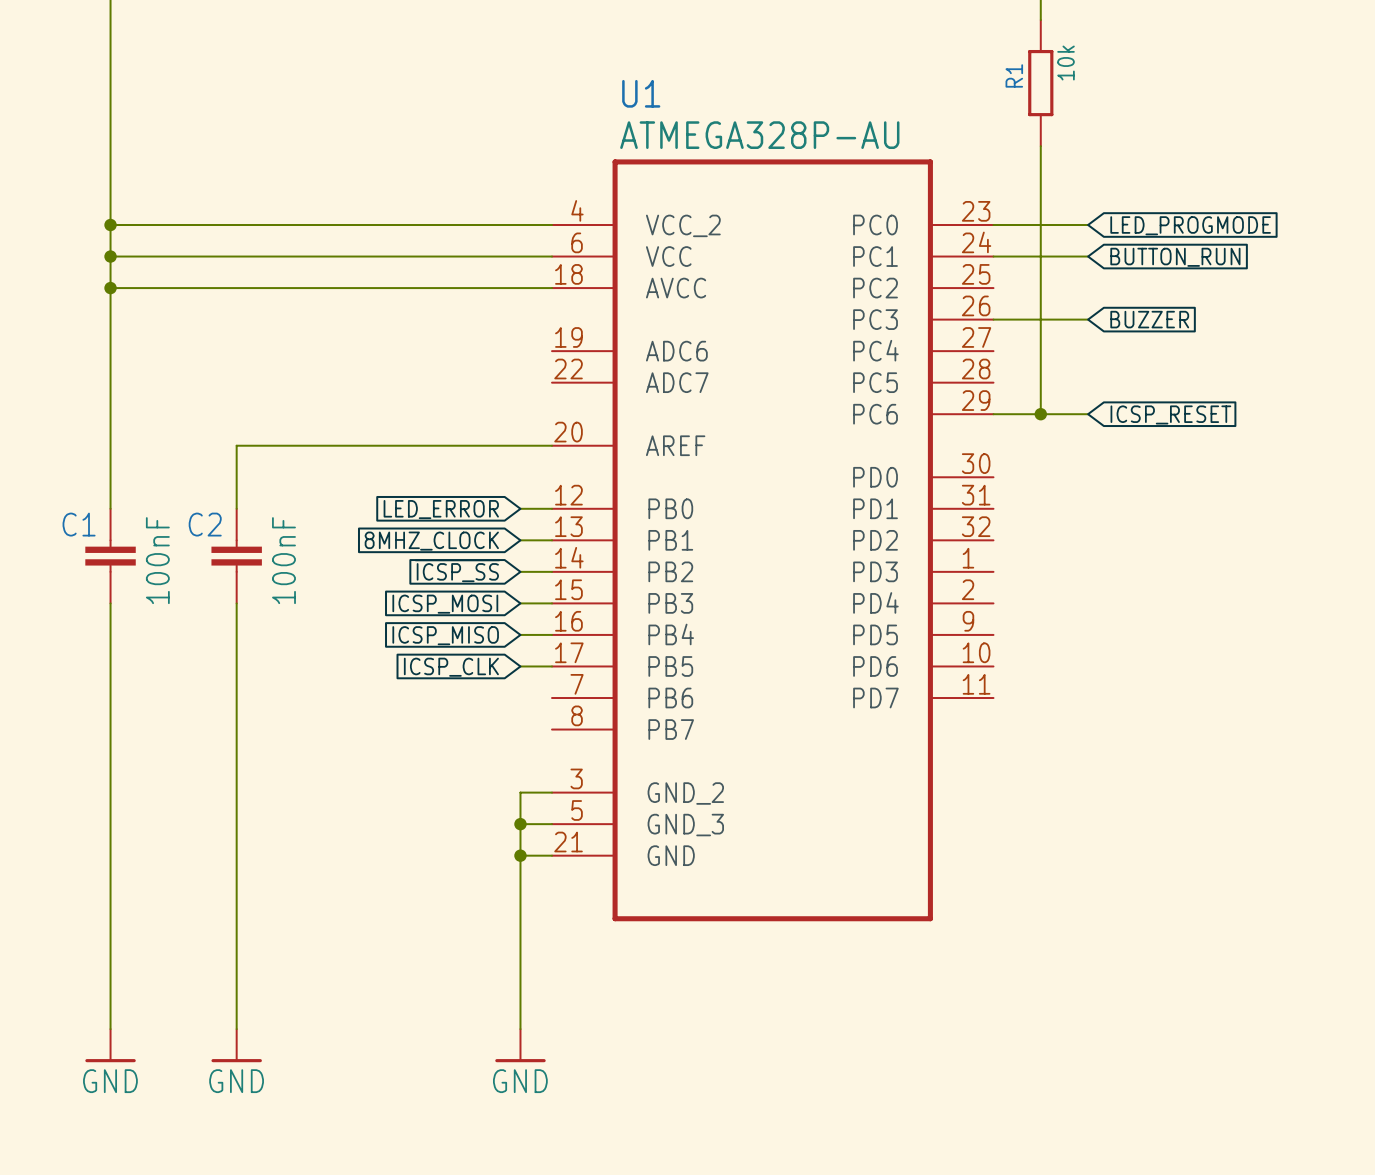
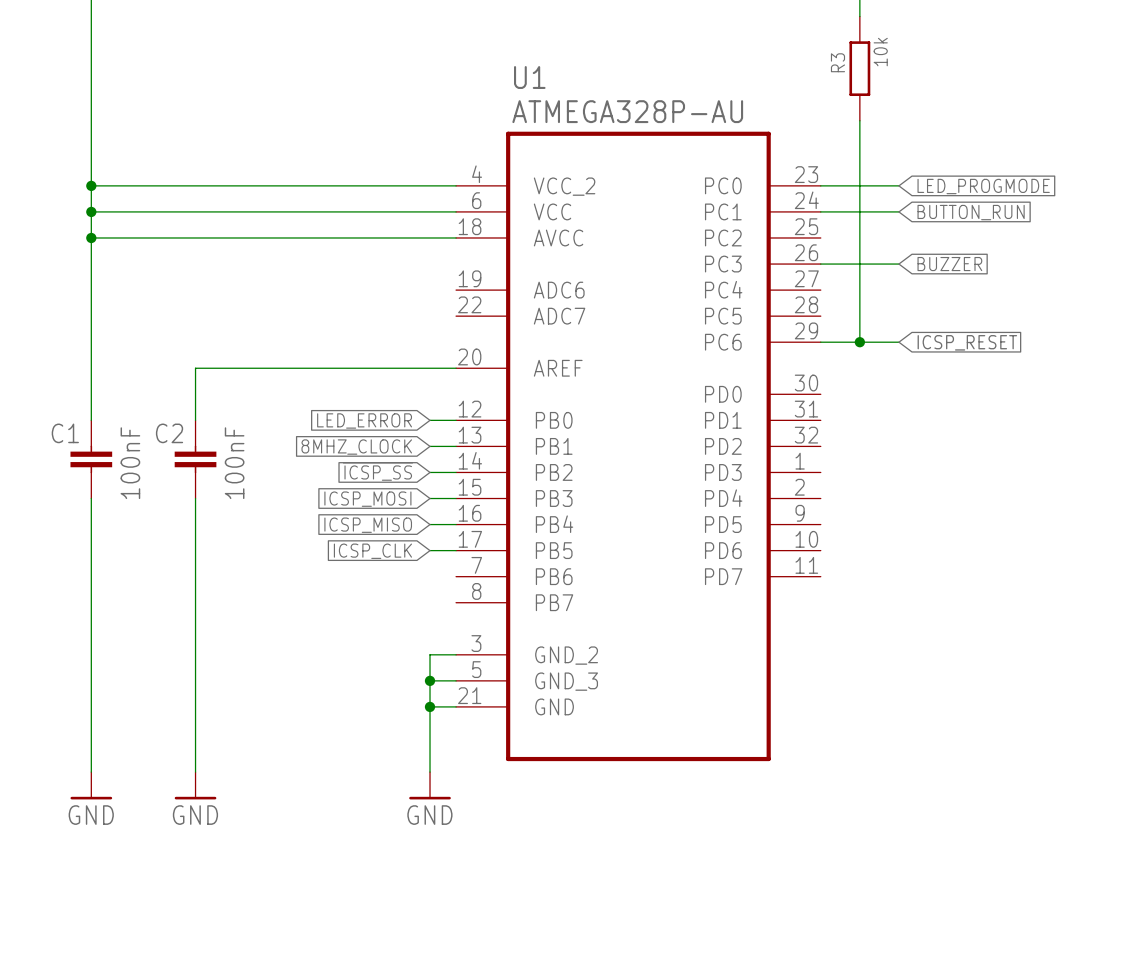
R1 name: R1 (1014, 75) -> R3 (837, 62)
wire: (110, 934) (110, 1029) -> none
wire: (236, 934) (236, 1029) -> none
wire: (520, 934) (520, 1029) -> none
power symbol: none -> GND (91, 785)
power symbol: none -> GND (195, 785)
power symbol: GND (110, 1045) -> none
power symbol: GND (236, 1045) -> none
power symbol position: GND (520, 1045) -> GND (430, 785)

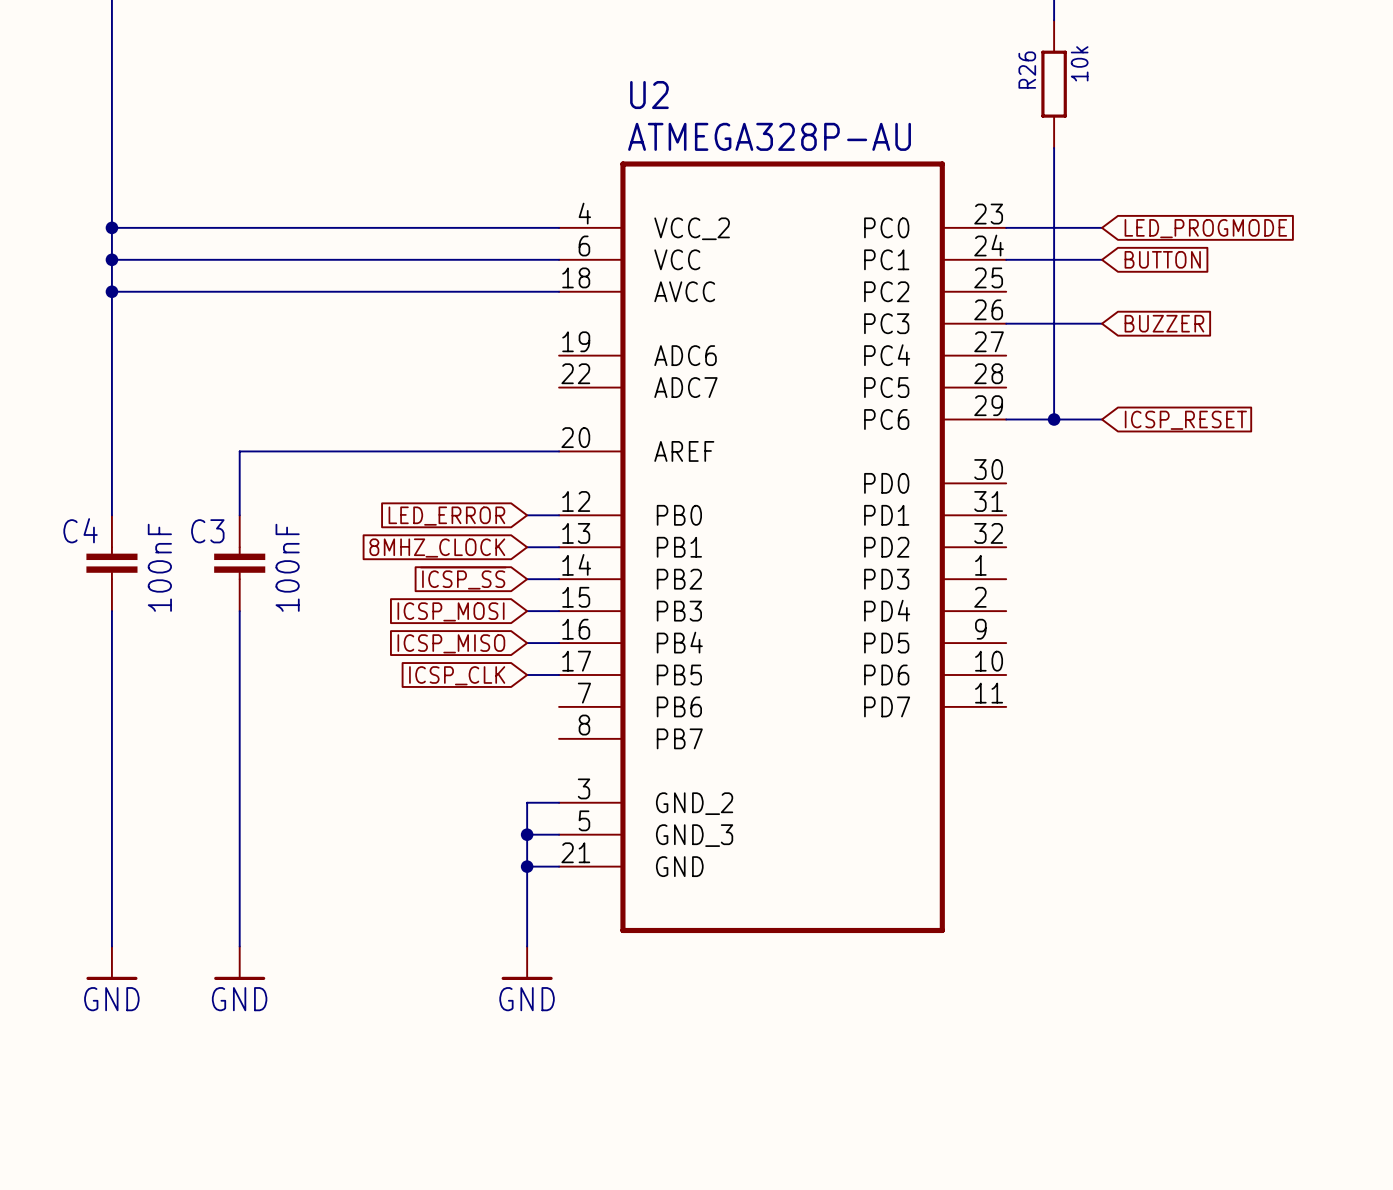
R3 name: R3 (837, 62) -> R26 (1027, 70)
U1 name: U1 (529, 77) -> U2 (649, 95)
global label: BUTTON_RUN (971, 212) -> BUTTON (1162, 259)
C1 name: C1 (65, 433) -> C4 (80, 530)
C2 name: C2 (169, 433) -> C3 (207, 531)

